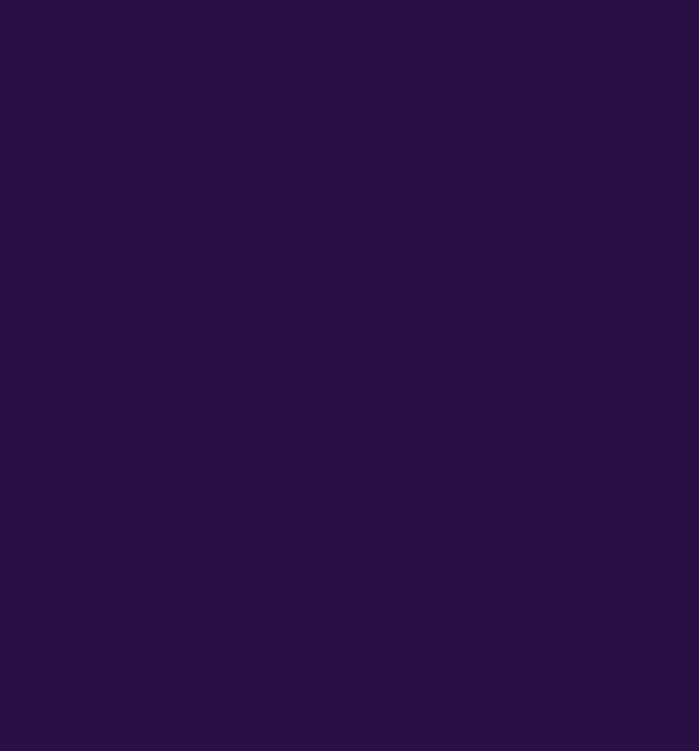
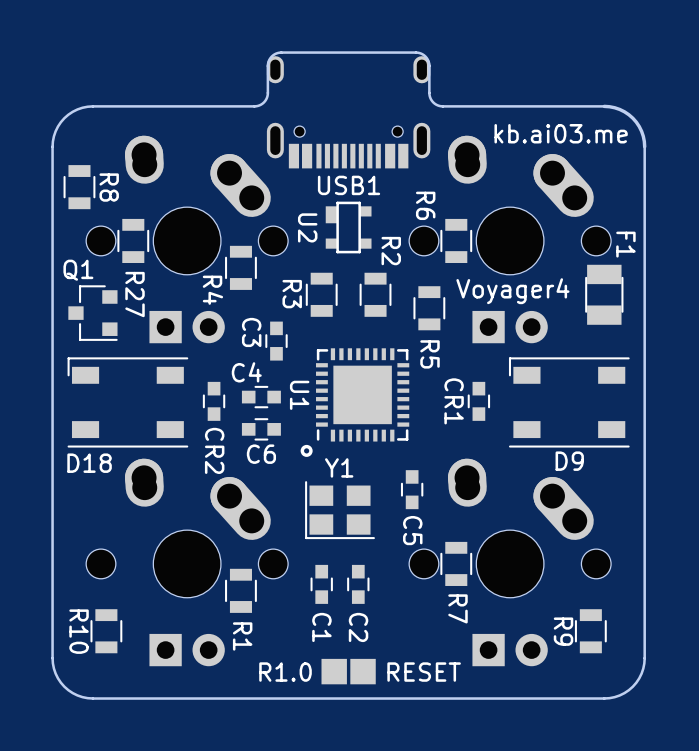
USB1: none -> (348, 112)
text: none -> kb.ai03.me (561, 133)
R8: none -> (79, 187)
U2: none -> (348, 227)
part: none -> (187, 239)
part: none -> (510, 239)
R27: none -> (133, 240)
R6: none -> (456, 240)
R4: none -> (240, 267)
text: none -> Voyager4 (512, 291)
R3: none -> (321, 294)
R2: none -> (375, 294)
F1: none -> (604, 294)
R5: none -> (429, 308)
Q1: none -> (93, 313)
C3: none -> (276, 341)
U1: none -> (362, 394)
C4: none -> (261, 397)
CR2: none -> (214, 401)
CR1: none -> (478, 401)
D18: none -> (127, 402)
D9: none -> (569, 402)
C6: none -> (261, 429)
drawing: none -> [300, 444, 313, 457]
C5: none -> (412, 489)
Y1: none -> (340, 510)
part: none -> (187, 562)
part: none -> (510, 562)
R7: none -> (456, 563)
C1: none -> (321, 584)
C2: none -> (358, 584)
R1: none -> (240, 590)
R10: none -> (106, 631)
R9: none -> (590, 631)
part: none -> (348, 671)
text: none -> R1.0 (285, 672)
text: none -> RESET (424, 672)
board edge: none -> (604, 698) (92, 698) (77, 695) (64, 686) (55, 673) (52, 658) (52, 146) (55, 131) (64, 118) (77, 109) (92, 106) (257, 105) (263, 102) (267, 96) (268, 60) (273, 55) (281, 52) (417, 52) (424, 55) (428, 60) (429, 96) (433, 102) (439, 105) (604, 106) (619, 109) (632, 118) (641, 131) (644, 146) (644, 658) (641, 673) (632, 686) (619, 695) (604, 698)

